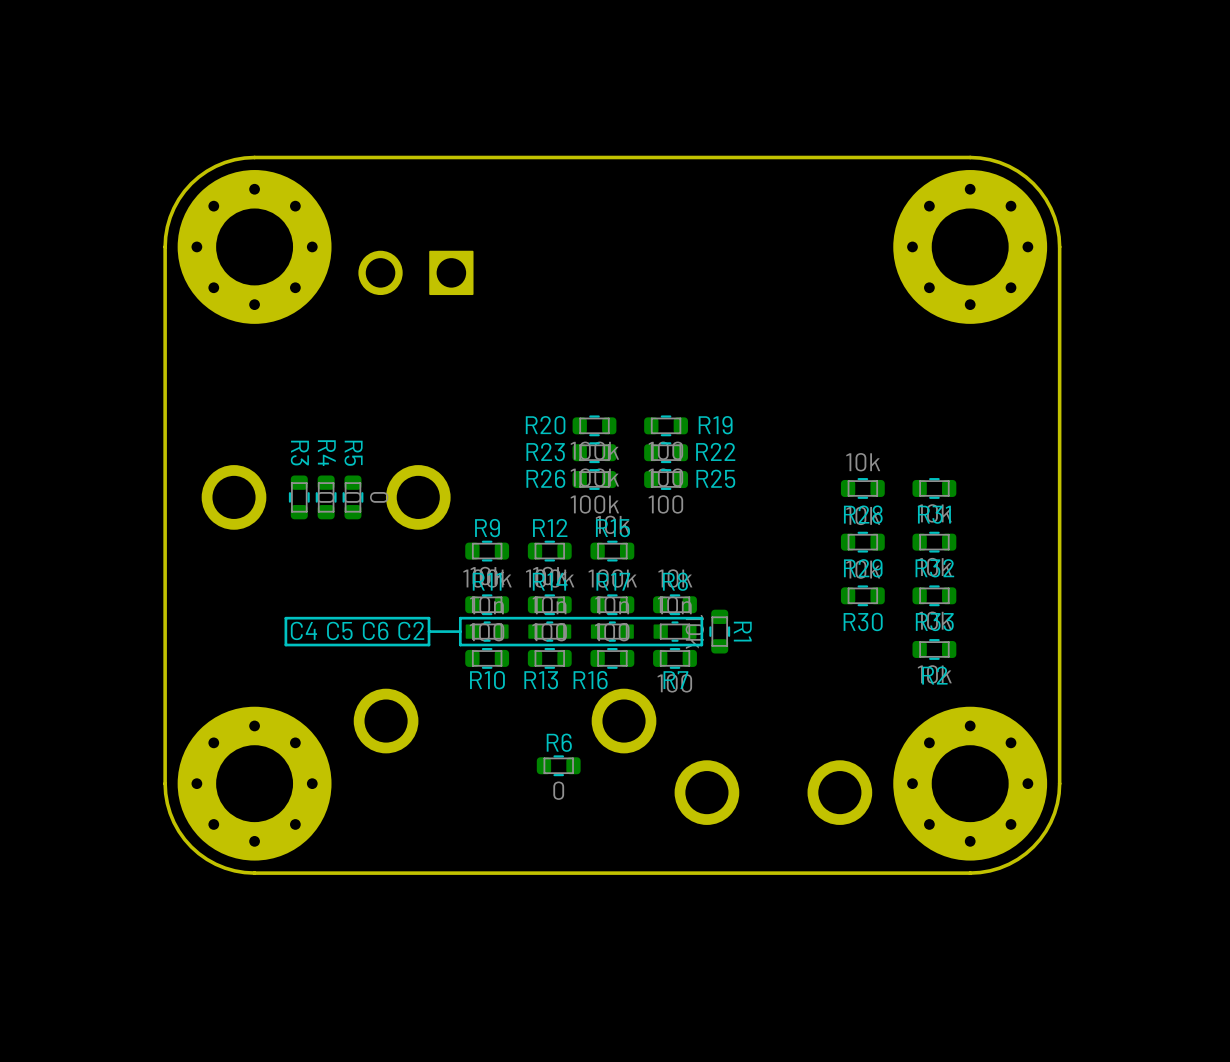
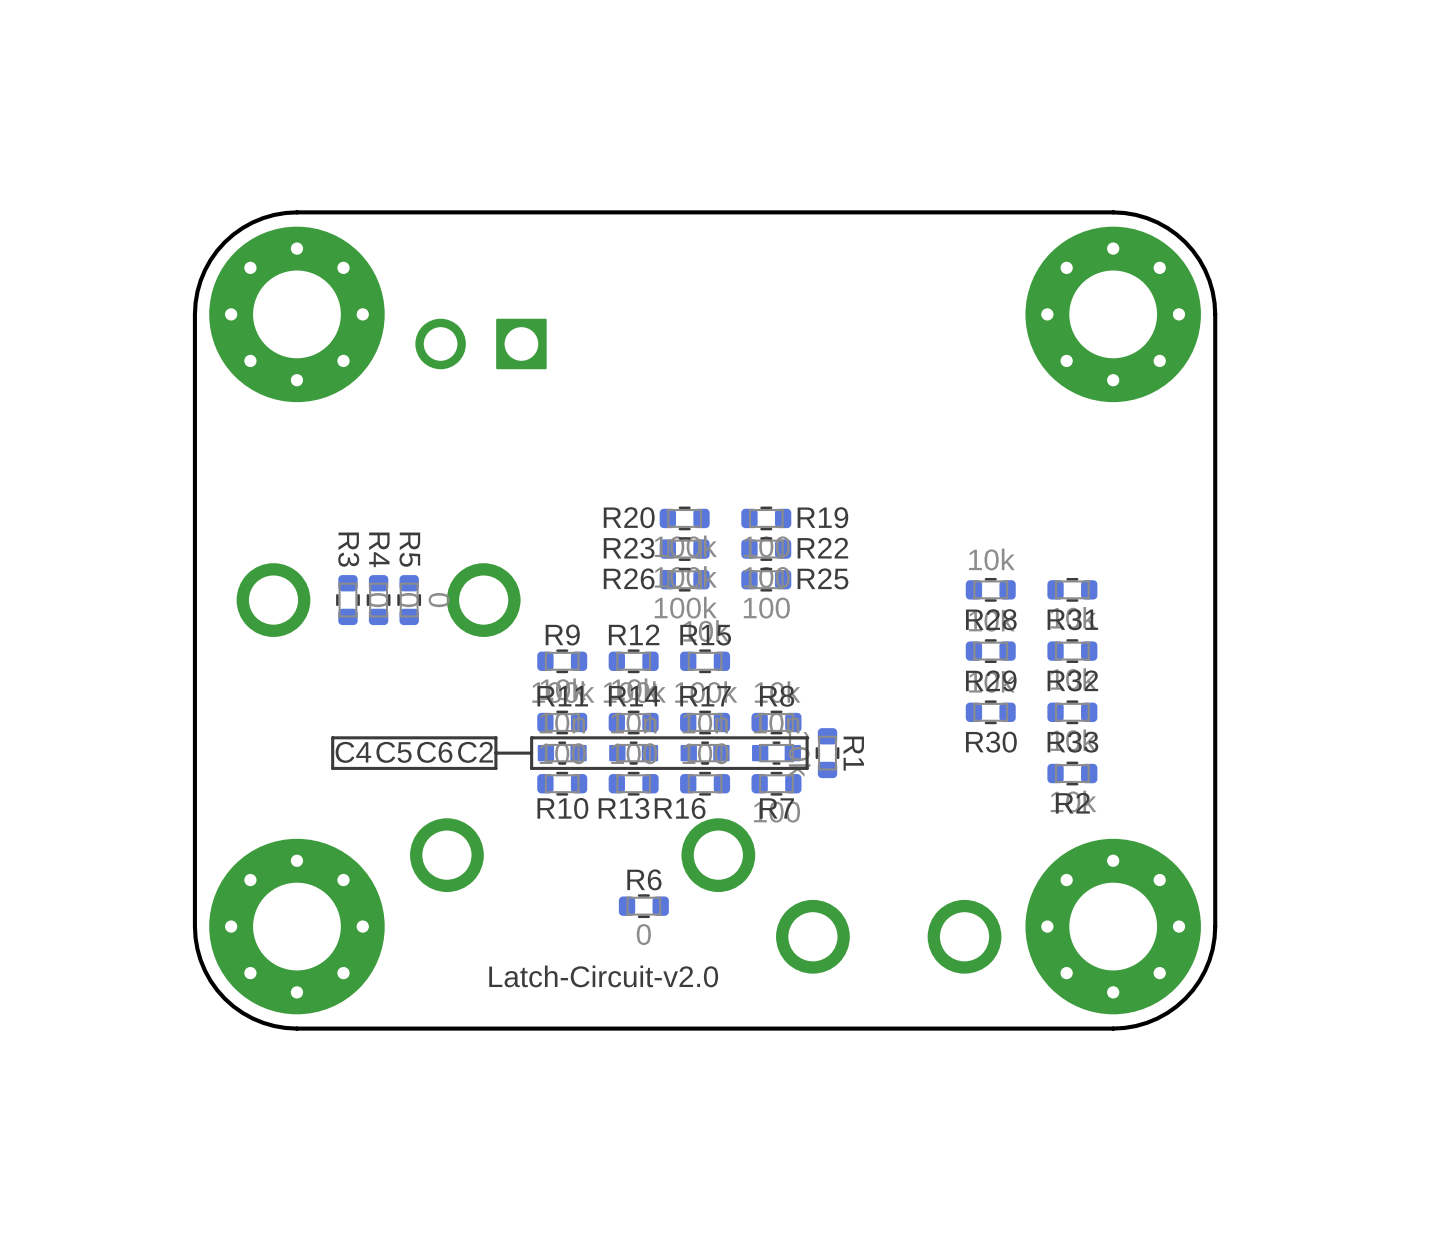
text: none -> Latch-Circuit-v2.0 (603, 976)

